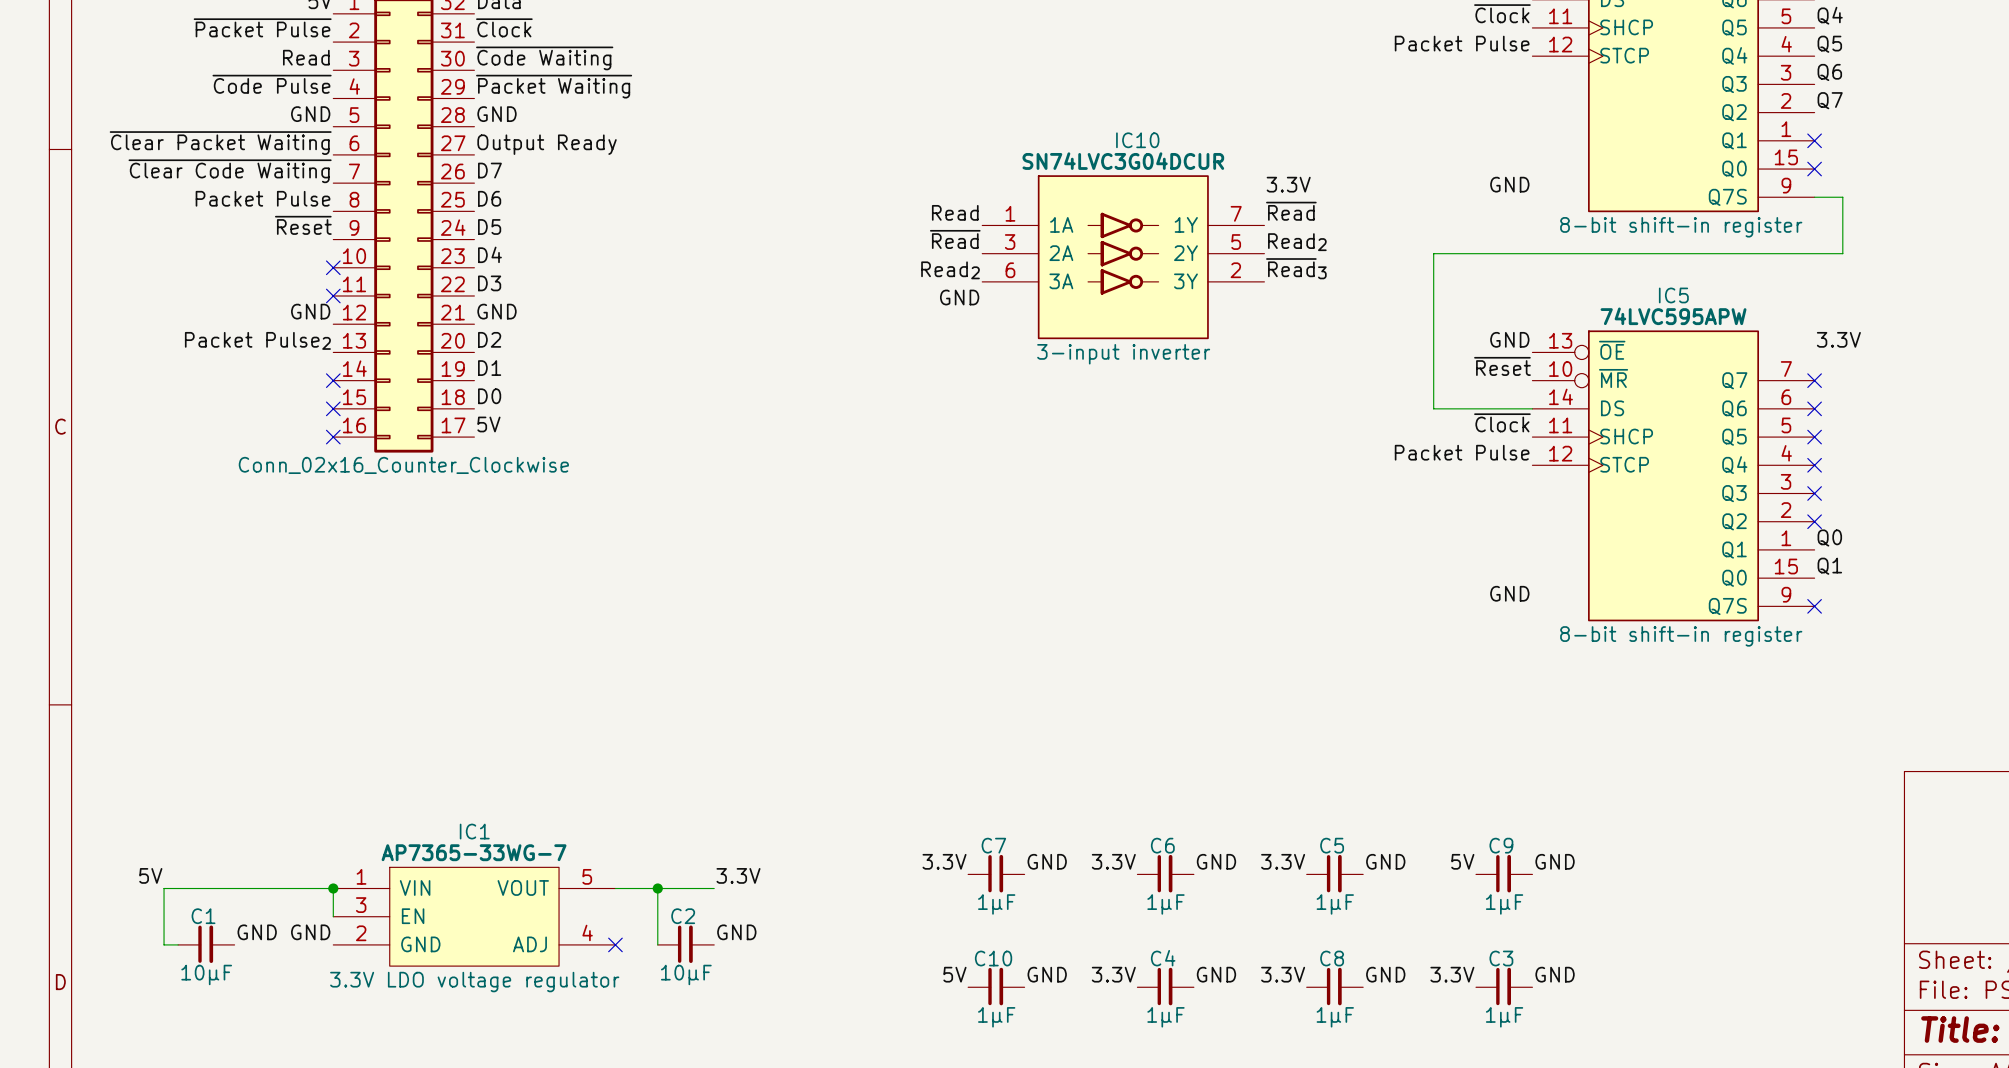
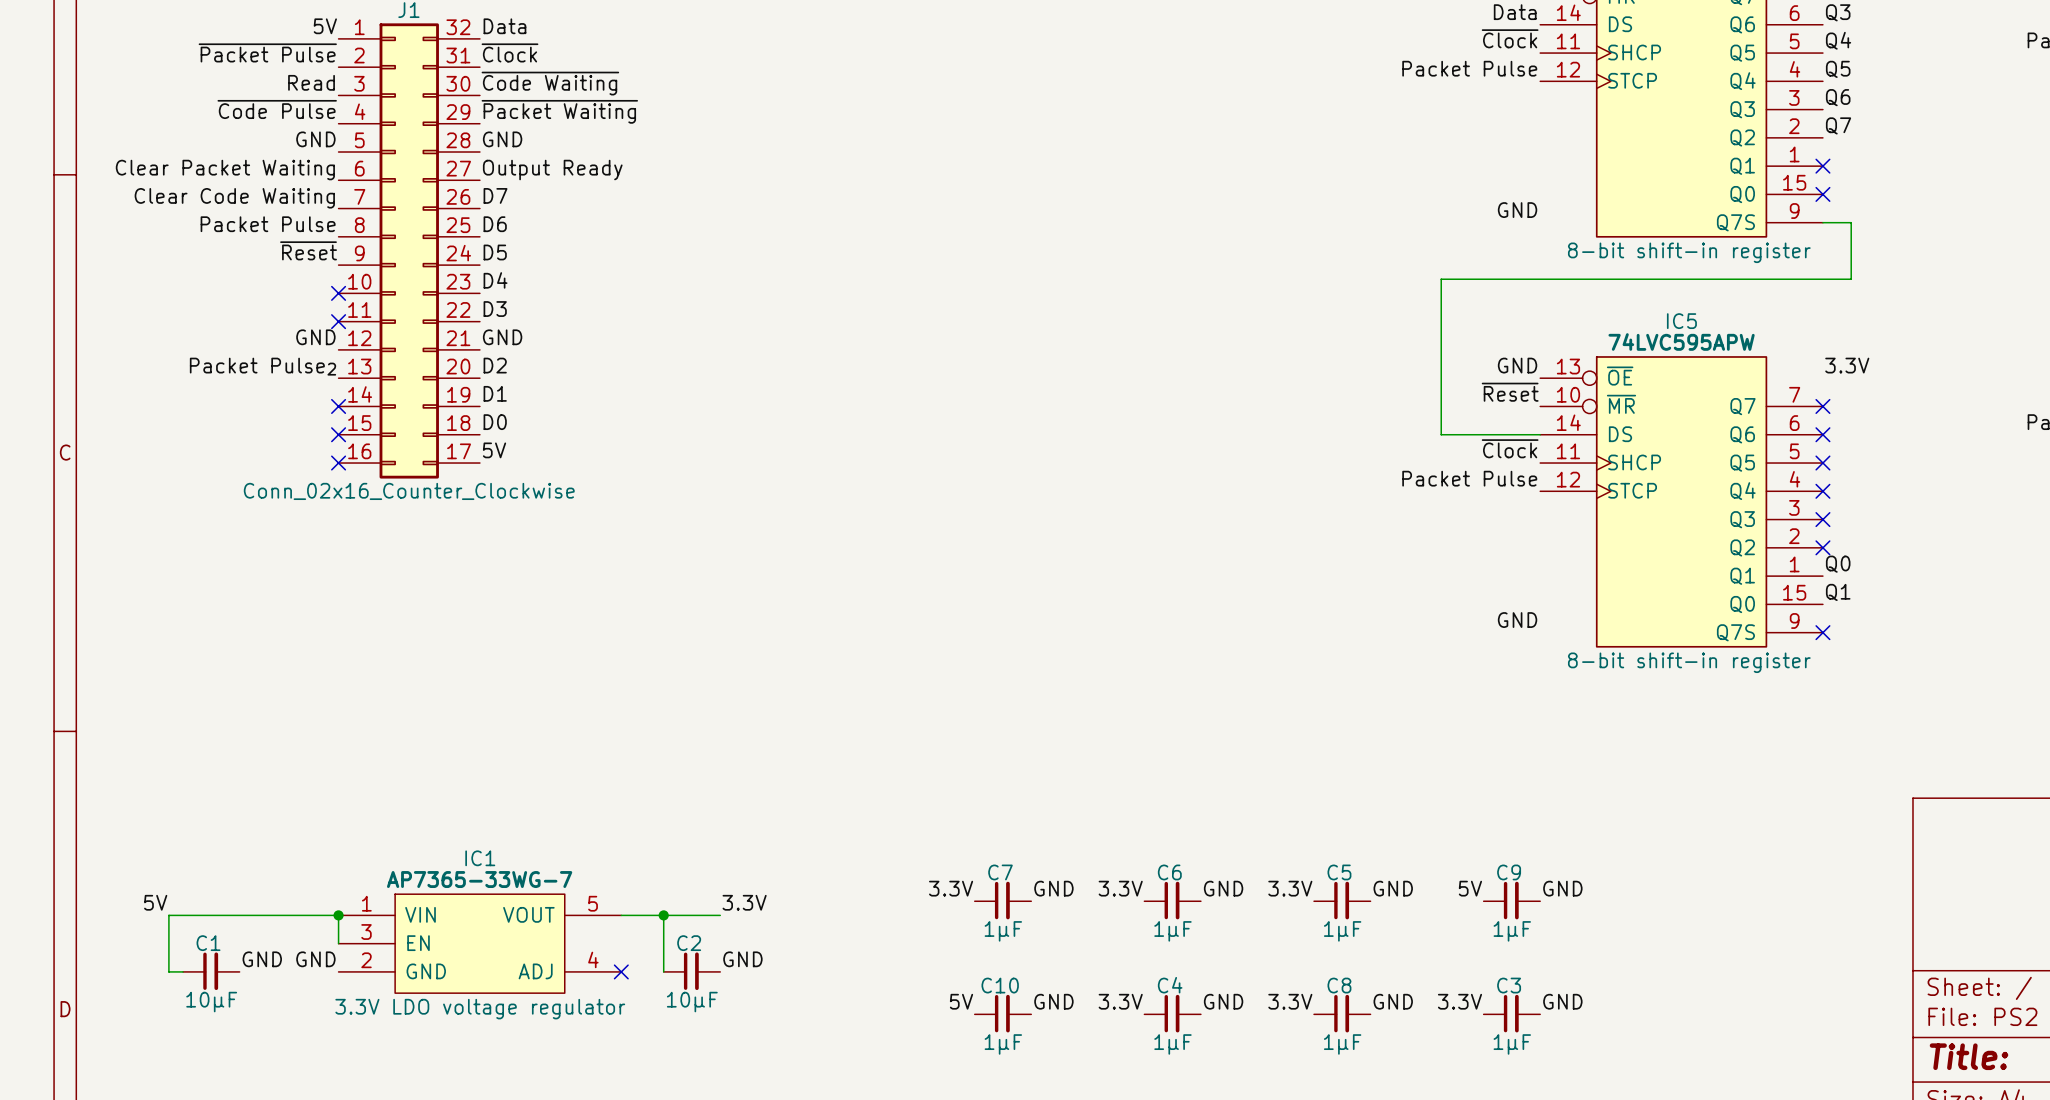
label: ~{Clear Packet Waiting} (220, 143) -> Clear Packet Waiting (225, 170)
label: ~{Clear Code Waiting} (230, 171) -> Clear Code Waiting (234, 198)
label: 3.3V (1288, 184) -> none
label: ~{Read} (1291, 211) -> none
label: Read (955, 212) -> none
label: ~{Read} (955, 239) -> none
label: Read2 (1297, 242) -> none
IC10: SN74LVC3G04DCUR (1123, 257) -> none
label: ~{Read}3 (1296, 268) -> none
label: Read2 (950, 270) -> none
label: GND (959, 297) -> none

